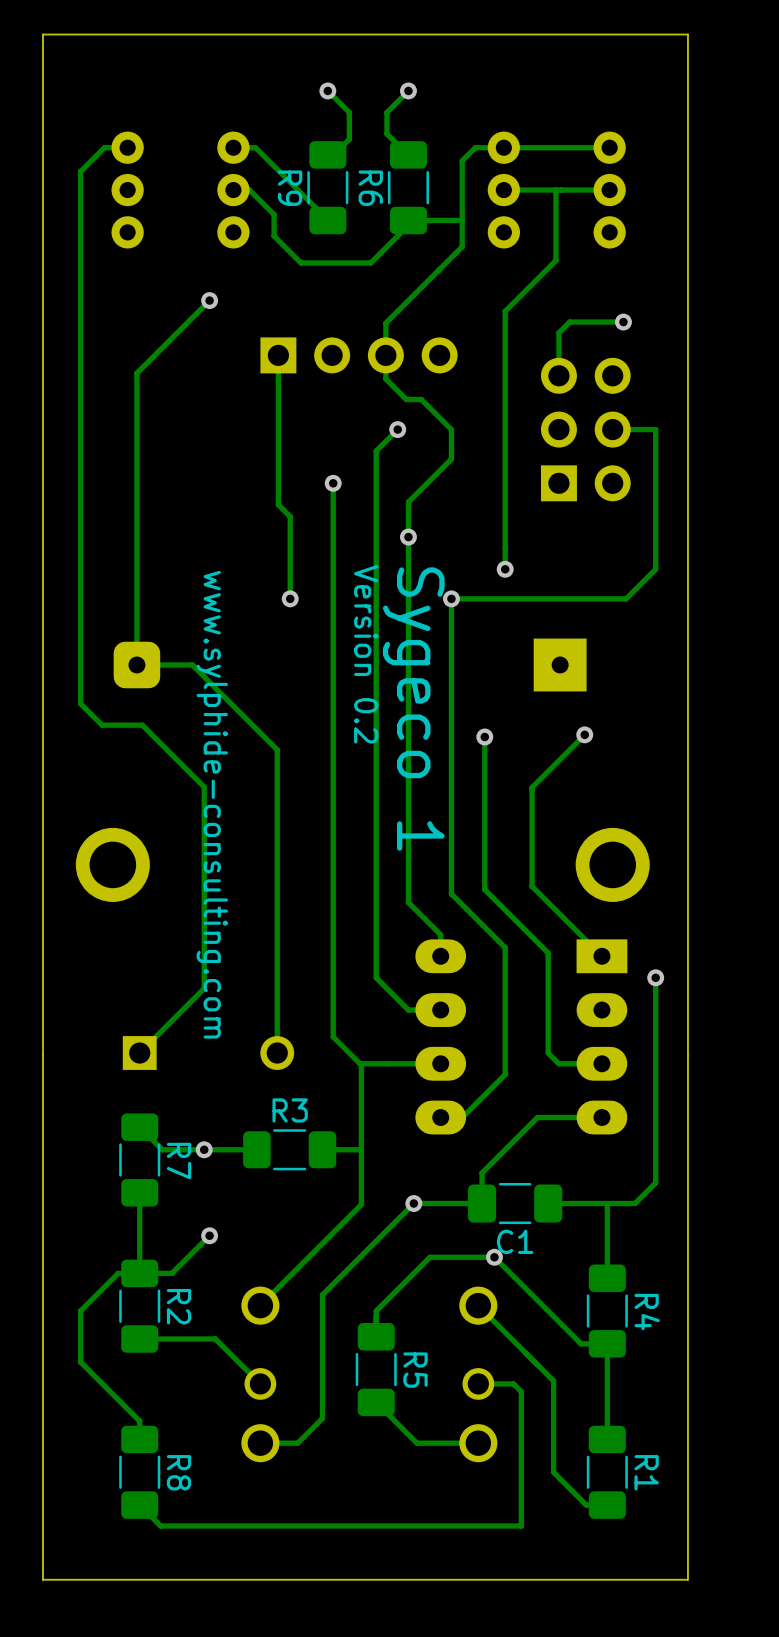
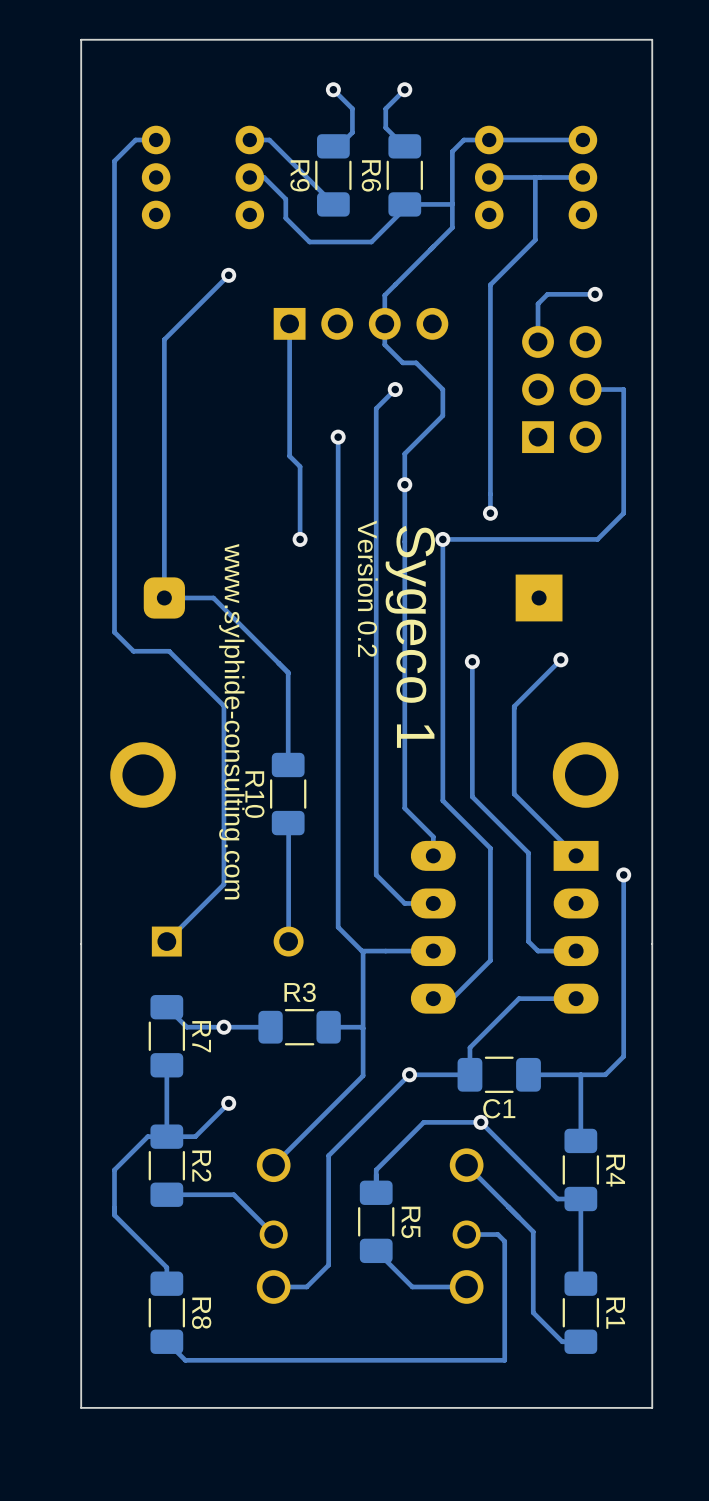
track: (277, 749) (277, 919) -> (288, 672) (288, 764)
R10: none -> (288, 794)

